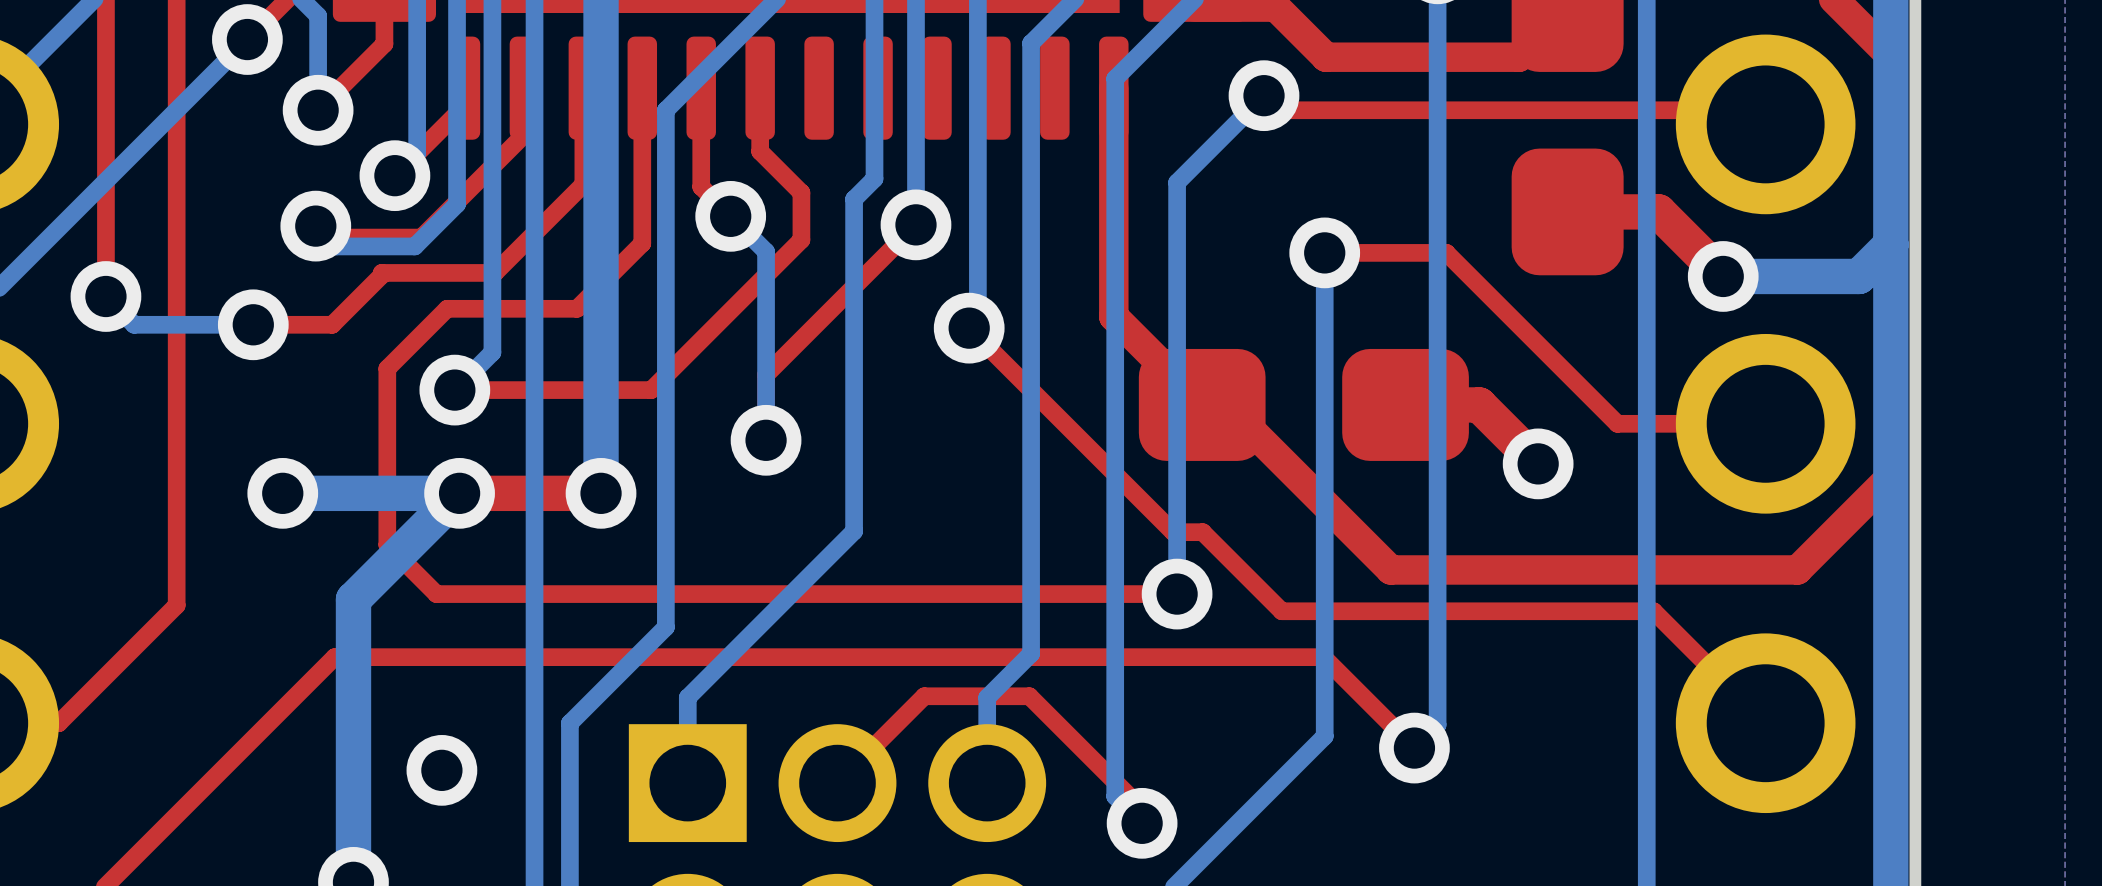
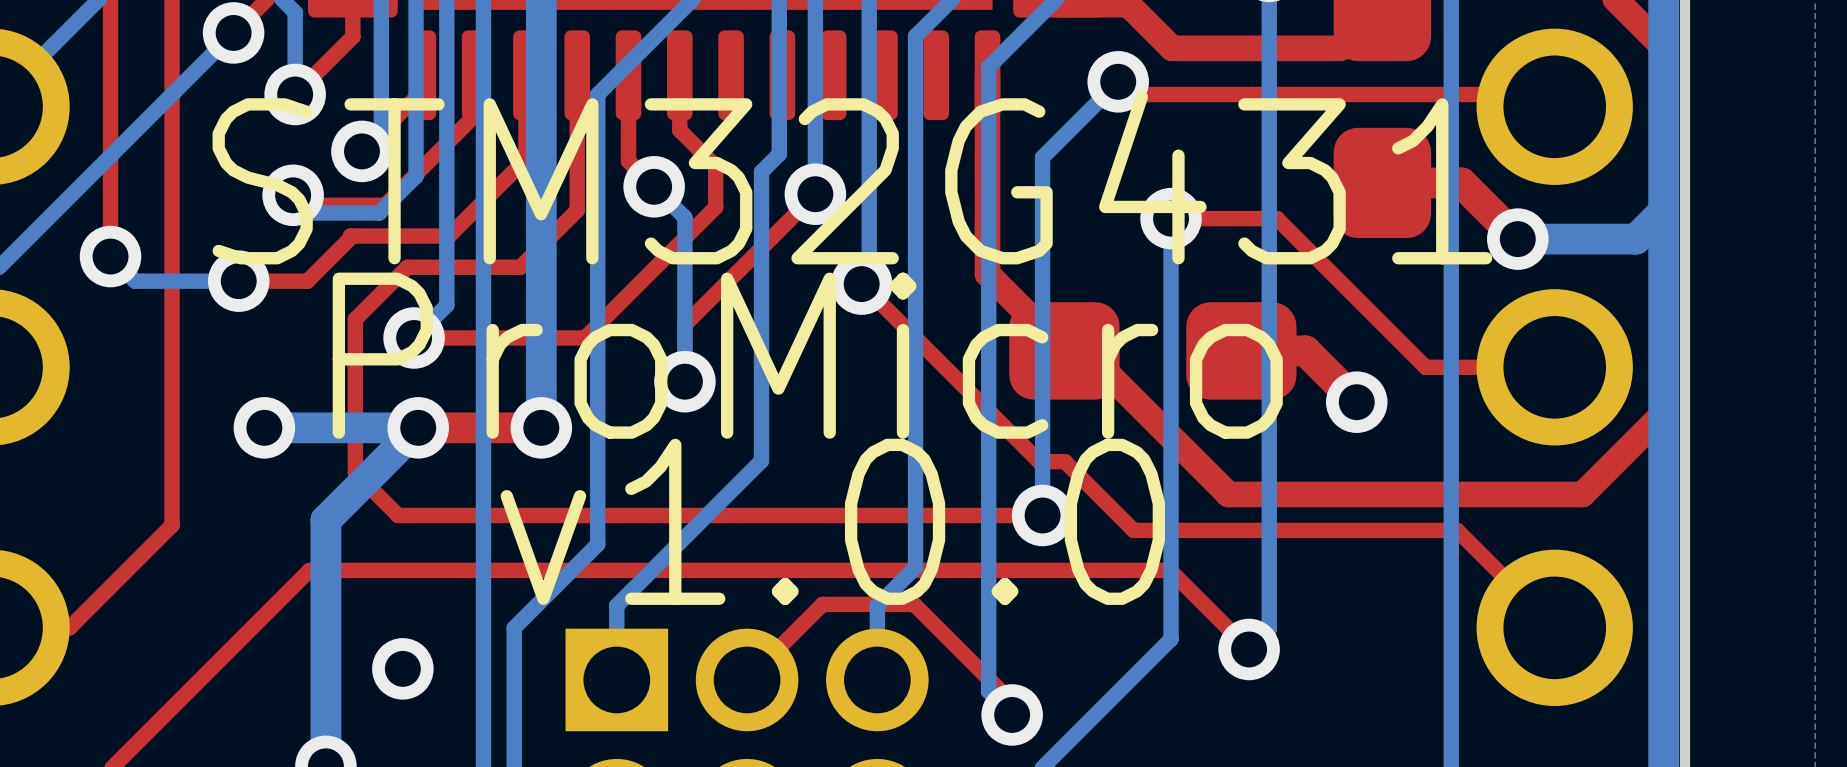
text: none -> STM32G431 (852, 177)
text: none -> ProMicro (807, 355)
text: none -> v1.0.0 (832, 521)

